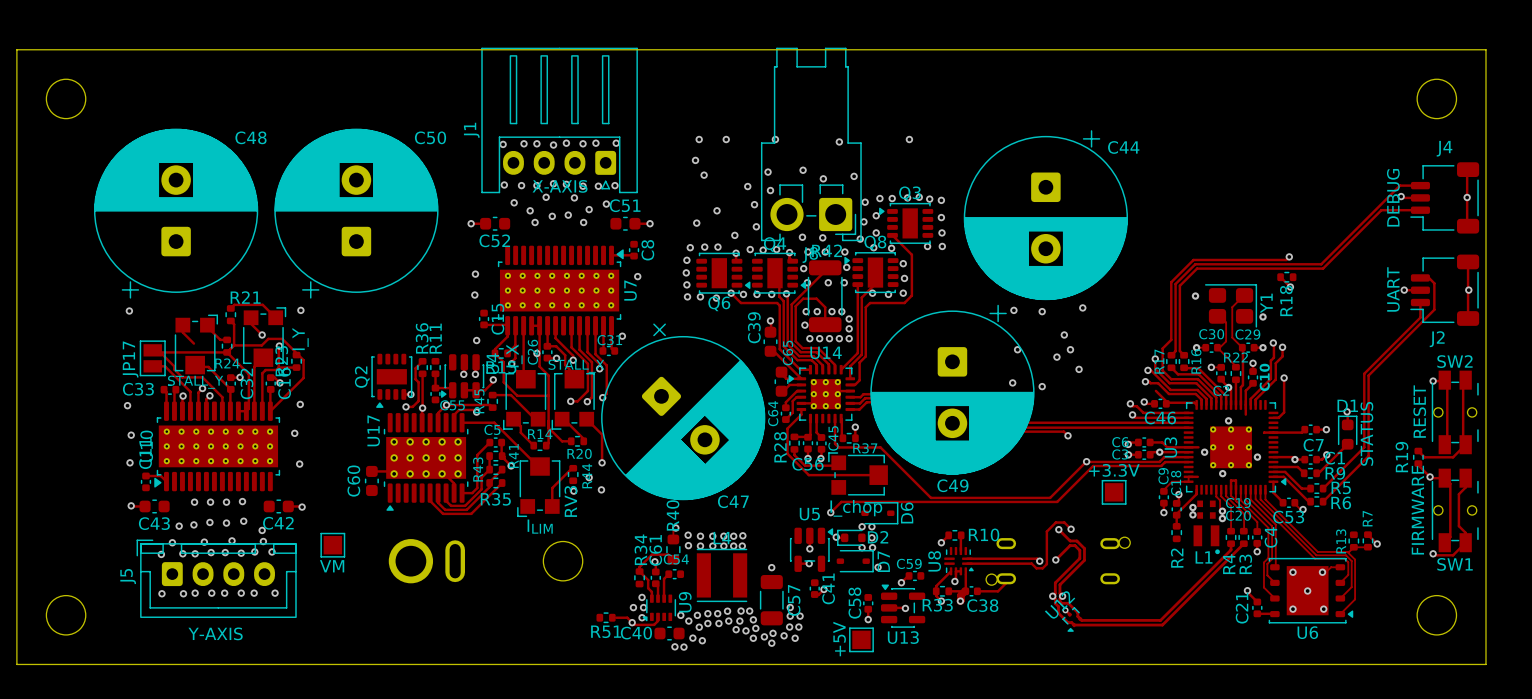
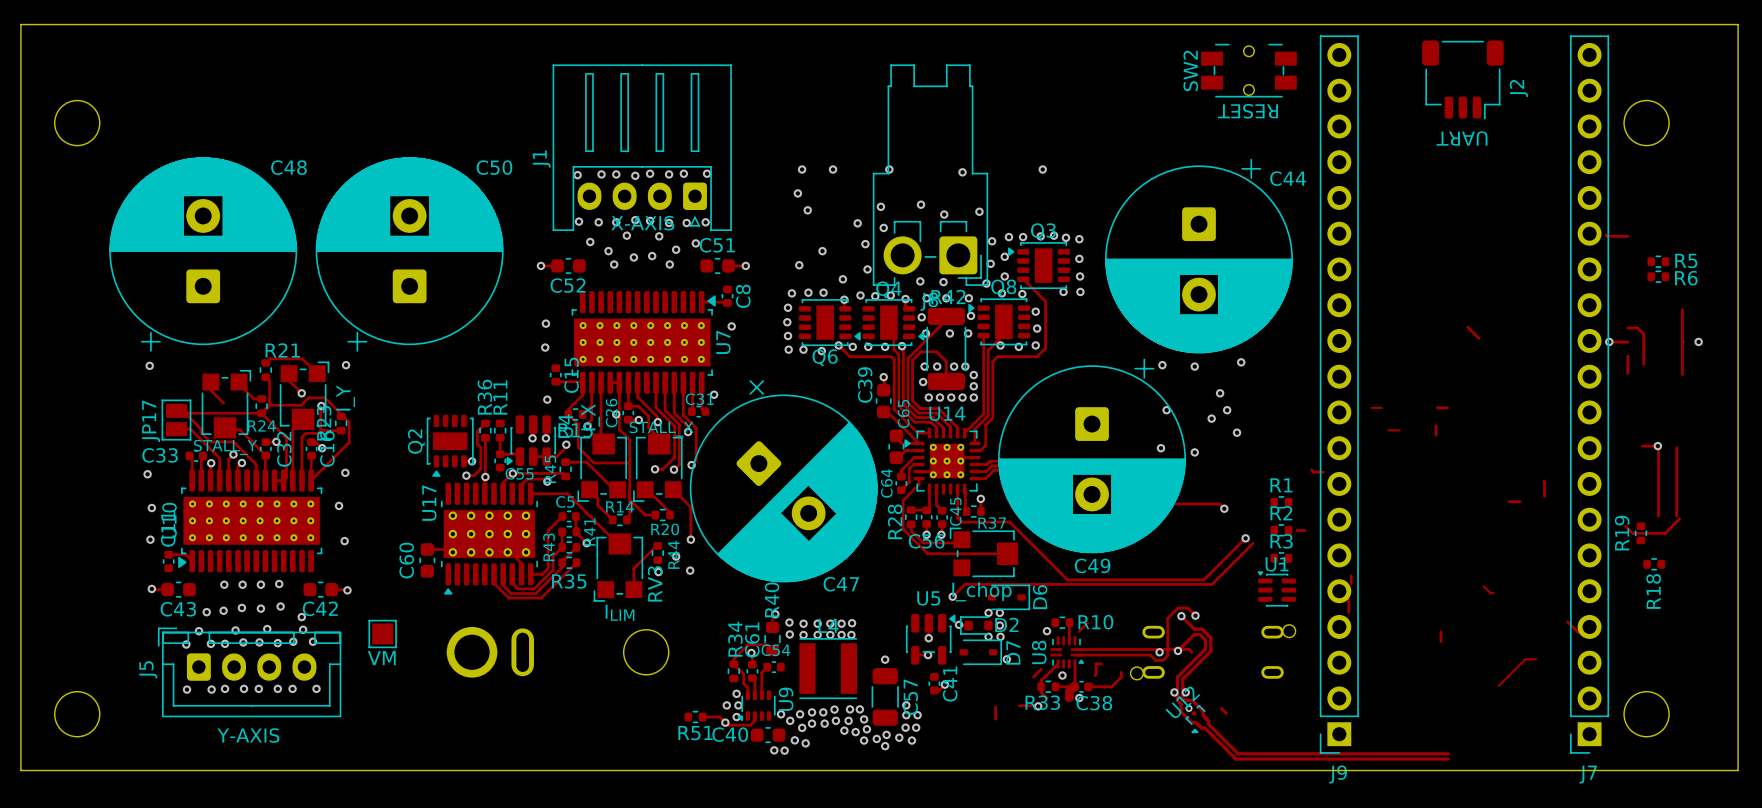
board edge: (16, 49) (1486, 49) (1486, 664) -> (20, 66) (20, 24) (1738, 24) (1738, 770) (1702, 770)
track: (1467, 169) (1467, 226) -> none
track: (1420, 185) (1399, 185) (1321, 264) (1195, 264) (1175, 284) (1175, 351) (1171, 355) -> none
via: (1401, 196) -> none
J4: (1444, 197) -> none
via: (1467, 197) -> none
track: (1420, 210) (1381, 210) (1323, 268) (1197, 268) (1179, 285) (1179, 351) (1184, 355) -> none
track: (1289, 256) (1286, 259) (1193, 259) (1171, 282) (1171, 339) (1162, 348) (1162, 370) (1171, 379) (1198, 379) (1216, 397) (1216, 402) -> none
via: (1289, 256) -> none
R18 position: (1286, 277) -> (1654, 564)
via: (1290, 287) -> none
J2 rotation: 0° (1444, 290) -> 90° counterclockwise (1462, 79)
J2 position: (1444, 290) -> (1462, 79)
via position: (1468, 290) -> (1698, 341)
track: (1244, 295) (1232, 307) -> none
via: (1195, 296) -> none
Y1: (1231, 305) -> none
track: (1232, 307) (1232, 337) (1243, 348) -> none
track: (1434, 309) (1368, 375) (1368, 456) (1323, 501) -> none
track: (1219, 316) (1226, 322) (1226, 341) (1219, 347) -> none
via: (1262, 316) -> none
track: (1420, 317) (1364, 373) (1364, 447) (1323, 488) -> none
J9: none -> (1339, 394)
J7: none -> (1589, 394)
track: (1273, 342) (1273, 357) (1270, 360) (1270, 378) (1250, 398) (1250, 404) -> none
via: (1273, 342) -> none
via: (1196, 347) -> none
C30: (1211, 347) -> none
track: (1217, 347) (1235, 366) -> none
C29: (1248, 347) -> none
via: (1262, 347) -> none
track: (1282, 347) (1282, 356) (1275, 363) (1275, 379) (1255, 399) (1255, 404) -> none
via: (1282, 347) -> none
track: (1242, 348) (1240, 404) -> none
track: (1155, 358) (1155, 368) (1169, 383) (1196, 383) (1211, 398) (1211, 404) -> none
via: (1155, 358) -> none
R17: (1171, 361) -> none
R16: (1184, 361) -> none
via: (1253, 363) -> none
track: (1171, 367) (1178, 374) (1198, 374) (1221, 396) (1221, 404) -> none
via: (1211, 367) -> none
track: (1184, 368) (1198, 368) (1226, 396) (1226, 404) -> none
track: (1147, 370) (1150, 370) (1170, 389) (1197, 389) (1206, 398) (1206, 404) -> none
via: (1147, 370) -> none
C2: (1221, 373) -> none
R22: (1235, 373) -> none
C10: (1253, 377) -> none
track: (1284, 378) (1284, 412) (1278, 417) (1273, 417) -> none
via: (1284, 378) -> none
track: (1235, 379) (1235, 404) -> none
track: (1221, 380) (1231, 389) (1231, 404) -> none
track: (1145, 381) (1158, 383) (1168, 393) (1195, 393) (1201, 399) (1201, 404) -> none
via: (1145, 381) -> none
via position: (1433, 381) -> (1657, 446)
track: (1253, 383) (1245, 390) (1245, 414) -> none
via: (1228, 387) -> none
track: (1155, 390) (1166, 401) -> none
via: (1144, 401) -> none
track: (1169, 402) (1194, 402) (1196, 404) -> none
track: (1130, 403) (1136, 406) (1143, 412) (1188, 412) -> none
via: (1130, 403) -> none
C46: (1160, 403) -> none
via: (1347, 411) -> none
SW2 rotation: 0° (1455, 412) -> 90° counterclockwise (1248, 70)
SW2 position: (1455, 412) -> (1248, 70)
track: (1132, 414) (1135, 417) (1188, 417) -> none
via: (1132, 414) -> none
via: (1228, 420) -> none
track: (1023, 422) (1188, 422) -> none
track: (1023, 427) (1188, 427) -> none
track: (1304, 429) (1301, 432) (1264, 432) -> none
C7: (1310, 429) -> none
via: (1326, 429) -> none
R1: none -> (1281, 502)
D1: (1347, 432) -> none
track: (1136, 442) (1128, 444) -> none
C6: (1144, 442) -> none
track: (1150, 442) (1162, 442) (1167, 447) (1198, 447) -> none
via: (1128, 444) -> none
track: (1347, 444) (1318, 473) -> none
U3: (1235, 447) -> none
via: (1159, 452) -> none
track: (1188, 452) (1152, 452) (1149, 454) -> none
via: (1204, 452) -> none
via: (1128, 454) -> none
C3: (1144, 454) -> none
track: (1326, 454) (1322, 459) (1316, 459) -> none
via: (1326, 454) -> none
track: (1188, 457) (1164, 457) (1159, 461) (1086, 461) -> none
via: (1257, 457) -> none
track: (1273, 457) (1304, 459) -> none
R19 position: (1418, 457) -> (1640, 533)
via: (1294, 459) -> none
C1: (1310, 459) -> none
track: (1188, 462) (1165, 462) (1161, 465) (1093, 465) -> none
track: (1418, 465) (1431, 478) (1444, 478) (1450, 483) (1450, 537) (1444, 542) -> none
track: (1273, 467) (1297, 467) (1304, 473) -> none
track: (1273, 471) (1285, 471) (1301, 488) (1310, 488) -> none
via: (1222, 473) -> none
R9: (1310, 473) -> none
track: (1197, 476) (1188, 476) (1188, 481) (1172, 481) (1163, 489) -> none
track: (1273, 476) (1283, 476) (1308, 501) -> none
via: (1430, 476) -> none
track: (1465, 478) (1465, 487) (1458, 494) (1458, 526) (1465, 532) (1465, 542) (1453, 555) (1433, 553) -> none
track: (1273, 481) (1273, 492) (1283, 502) -> none
R5 position: (1316, 488) -> (1658, 261)
track: (1196, 489) (1196, 494) (1176, 514) -> none
track: (1216, 489) (1216, 496) (1220, 500) (1220, 509) -> none
track: (1221, 489) (1221, 496) (1231, 506) (1231, 531) -> none
track: (1226, 489) (1226, 496) (1244, 514) (1244, 530) -> none
track: (1231, 489) (1231, 480) (1235, 480) (1235, 489) -> none
track: (1231, 489) (1231, 495) (1257, 522) (1257, 531) -> none
track: (1235, 489) (1235, 500) -> none
track: (1240, 489) (1240, 500) (1268, 527) (1268, 558) (1263, 562) (1263, 587) (1274, 598) -> none
track: (1245, 489) (1245, 499) (1272, 526) (1272, 559) (1267, 563) (1267, 575) (1274, 582) -> none
track: (1250, 489) (1250, 499) (1275, 524) (1275, 566) -> none
track: (1255, 489) (1255, 499) (1315, 558) (1344, 558) (1348, 562) (1348, 574) (1340, 582) -> none
track: (1260, 489) (1260, 499) (1316, 555) (1346, 555) (1351, 561) (1351, 587) (1340, 598) -> none
track: (1265, 489) (1265, 499) (1317, 551) (1349, 551) (1353, 547) (1367, 547) -> none
part: +3.3V (1114, 492) -> none
via: (1178, 494) -> none
C9: (1163, 497) -> none
R6 position: (1316, 501) -> (1658, 276)
C53: (1288, 502) -> none
C19: (1206, 503) -> none
U1: none -> (1276, 588)
via: (1192, 507) -> none
C18: (1176, 509) -> none
via: (1303, 509) -> none
SW1: (1455, 510) -> none
via: (1222, 511) -> none
via: (1163, 512) -> none
via: (1192, 514) -> none
C20: (1206, 515) -> none
via: (1222, 518) -> none
track: none -> (1181, 616) (1194, 629) (1202, 629) (1210, 637) (1210, 651) (1182, 679) (1182, 689) (1185, 692) (1182, 698) (1184, 700) (1192, 700) (1203, 711) (1203, 715) (1208, 721) (1208, 724) (1238, 753) (1448, 753)
via: none -> (1181, 616)
via: none -> (1195, 615)
track: (1058, 529) (1070, 540) (1076, 540) (1084, 548) (1084, 560) (1059, 584) (1059, 593) (1062, 596) (1059, 601) (1068, 603) (1077, 612) (1077, 616) (1081, 620) (1160, 620) (1231, 549) (1231, 543) -> none
via: (1058, 529) -> none
track: (1071, 529) (1064, 522) (1055, 522) (1046, 531) (1046, 564) (1042, 568) (1036, 568) (1031, 563) (1003, 563) -> (1195, 615) (1187, 608) (1178, 608) (1167, 618) (1167, 655) (1162, 660) (1155, 660) (1150, 655)
via: (1071, 529) -> none
R2 rotation: 0° (1176, 532) -> 90° clockwise (1281, 530)
R2 position: (1176, 532) -> (1281, 530)
R10 position: (954, 535) -> (1062, 622)
track: (960, 535) (960, 551) -> (1069, 623) (1069, 640)
R4: (1231, 537) -> none
R3 rotation: 0° (1243, 537) -> 90° clockwise (1281, 558)
R3 position: (1243, 537) -> (1281, 558)
C4: (1257, 537) -> none
L1: (1206, 539) -> none
R7: (1367, 540) -> none
R13: (1353, 541) -> none
via: none -> (1046, 631)
via: (941, 542) -> none
track: (1243, 543) (1162, 625) (1074, 625) (1067, 622) (1058, 613) (1058, 606) (1052, 596) (1055, 593) (1055, 582) (1079, 558) (1079, 550) (1075, 545) (1070, 545) (1055, 559) -> none
via: (1377, 543) -> none
via: (1257, 551) -> none
track: (1347, 551) (1355, 559) (1355, 599) (1340, 614) -> none
via: (1433, 553) -> none
track: none -> (1076, 649) (1109, 649)
R2 name position: R2 (1177, 558) -> R2 (1281, 513)
track: none -> (1177, 650) (1194, 634) (1199, 634) (1205, 639) (1205, 649) (1177, 677) (1177, 689) (1174, 692) (1181, 704) (1181, 711) (1191, 722) (1196, 722) (1201, 728) (1204, 728) (1235, 759) (1448, 759)
via: (1055, 559) -> none
U8 position: (959, 561) -> (1067, 652)
via: none -> (1159, 652)
via position: (1039, 561) -> (1177, 650)
track: none -> (1076, 655) (1109, 655)
R3 name position: R3 (1245, 564) -> R3 (1281, 541)
track: (951, 571) (936, 586) (936, 595) (941, 601) -> (1058, 663) (1041, 680) (1041, 692) (1046, 698)
via: (1292, 572) -> none
via: (1322, 572) -> none
C59: (914, 575) -> none
track: none -> (1074, 668) (1074, 686)
track: (965, 575) (965, 591) (960, 595) (960, 601) -> none
track: none -> (1121, 672) (1121, 677) (1111, 686) (1107, 686)
track: (1006, 578) (1006, 583) (998, 591) (977, 591) -> none
via: none -> (1062, 675)
via: (954, 581) -> none
via: (901, 582) -> none
track: (1247, 590) (1257, 602) -> none
via: (1247, 590) -> none
via: (1307, 590) -> none
U6: (1310, 590) -> none
track: none -> (1055, 686) (1074, 686)
track: none -> (1074, 686) (1069, 691) (1068, 698)
R33 position: (942, 591) -> (1048, 686)
C38 position: (971, 591) -> (1081, 686)
via: none -> (1174, 692)
via: none -> (1185, 692)
via: (1052, 596) -> none
via: (1062, 596) -> none
via: (960, 601) -> none
C58: (868, 603) -> none
U13: (903, 606) -> none
C21: (1257, 607) -> none
via: (1292, 609) -> none
via: (1323, 609) -> none
via position: (1065, 610) -> (1189, 708)
track: (1257, 613) (1274, 613) -> none
via: (868, 619) -> none
U12 position: (1072, 619) -> (1196, 719)
part: +5V (861, 639) -> none

